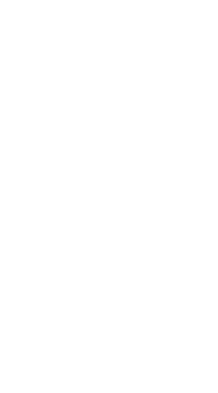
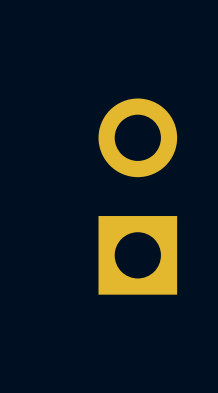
part: none -> (137, 196)

